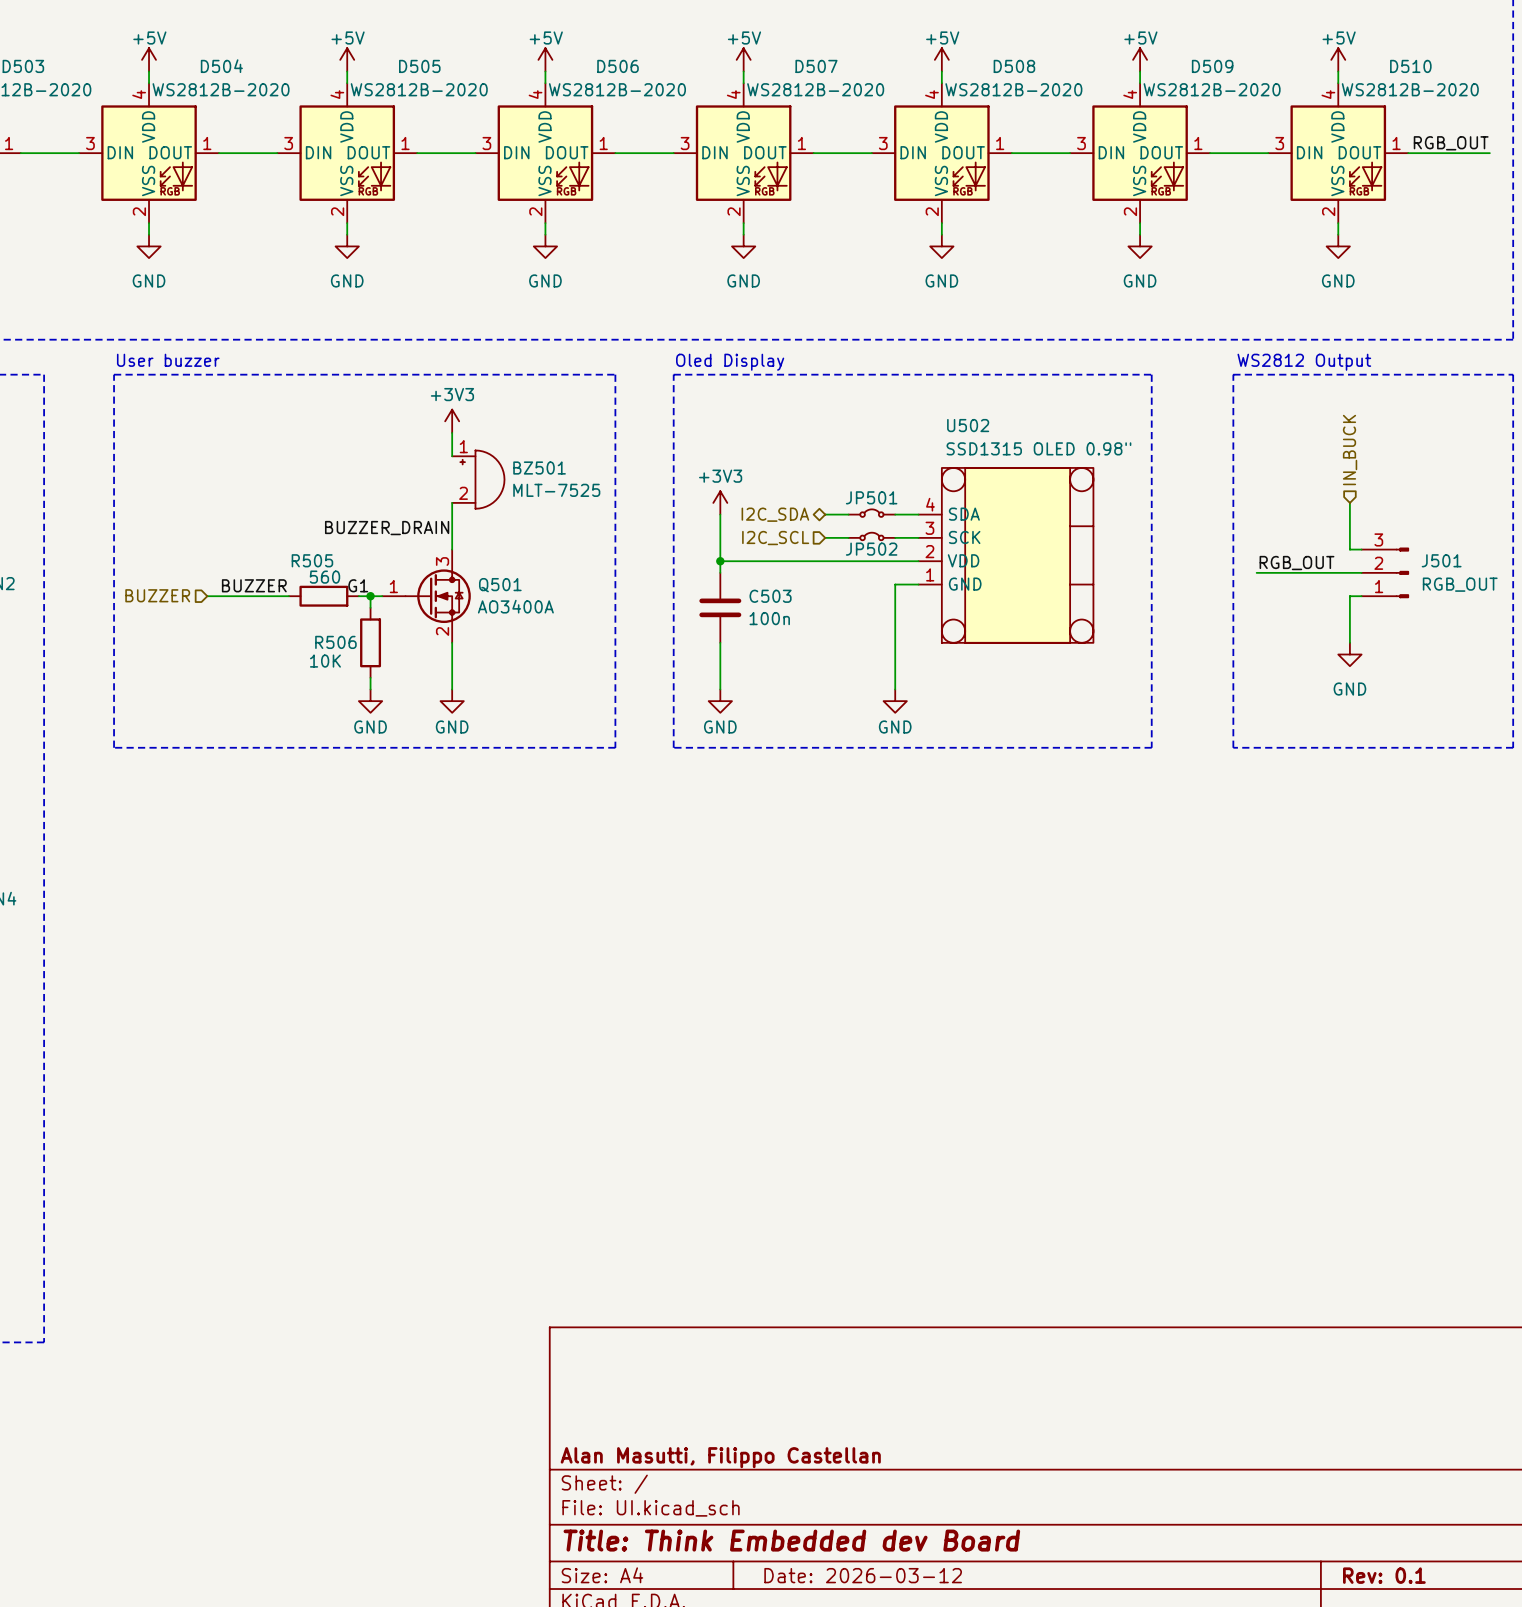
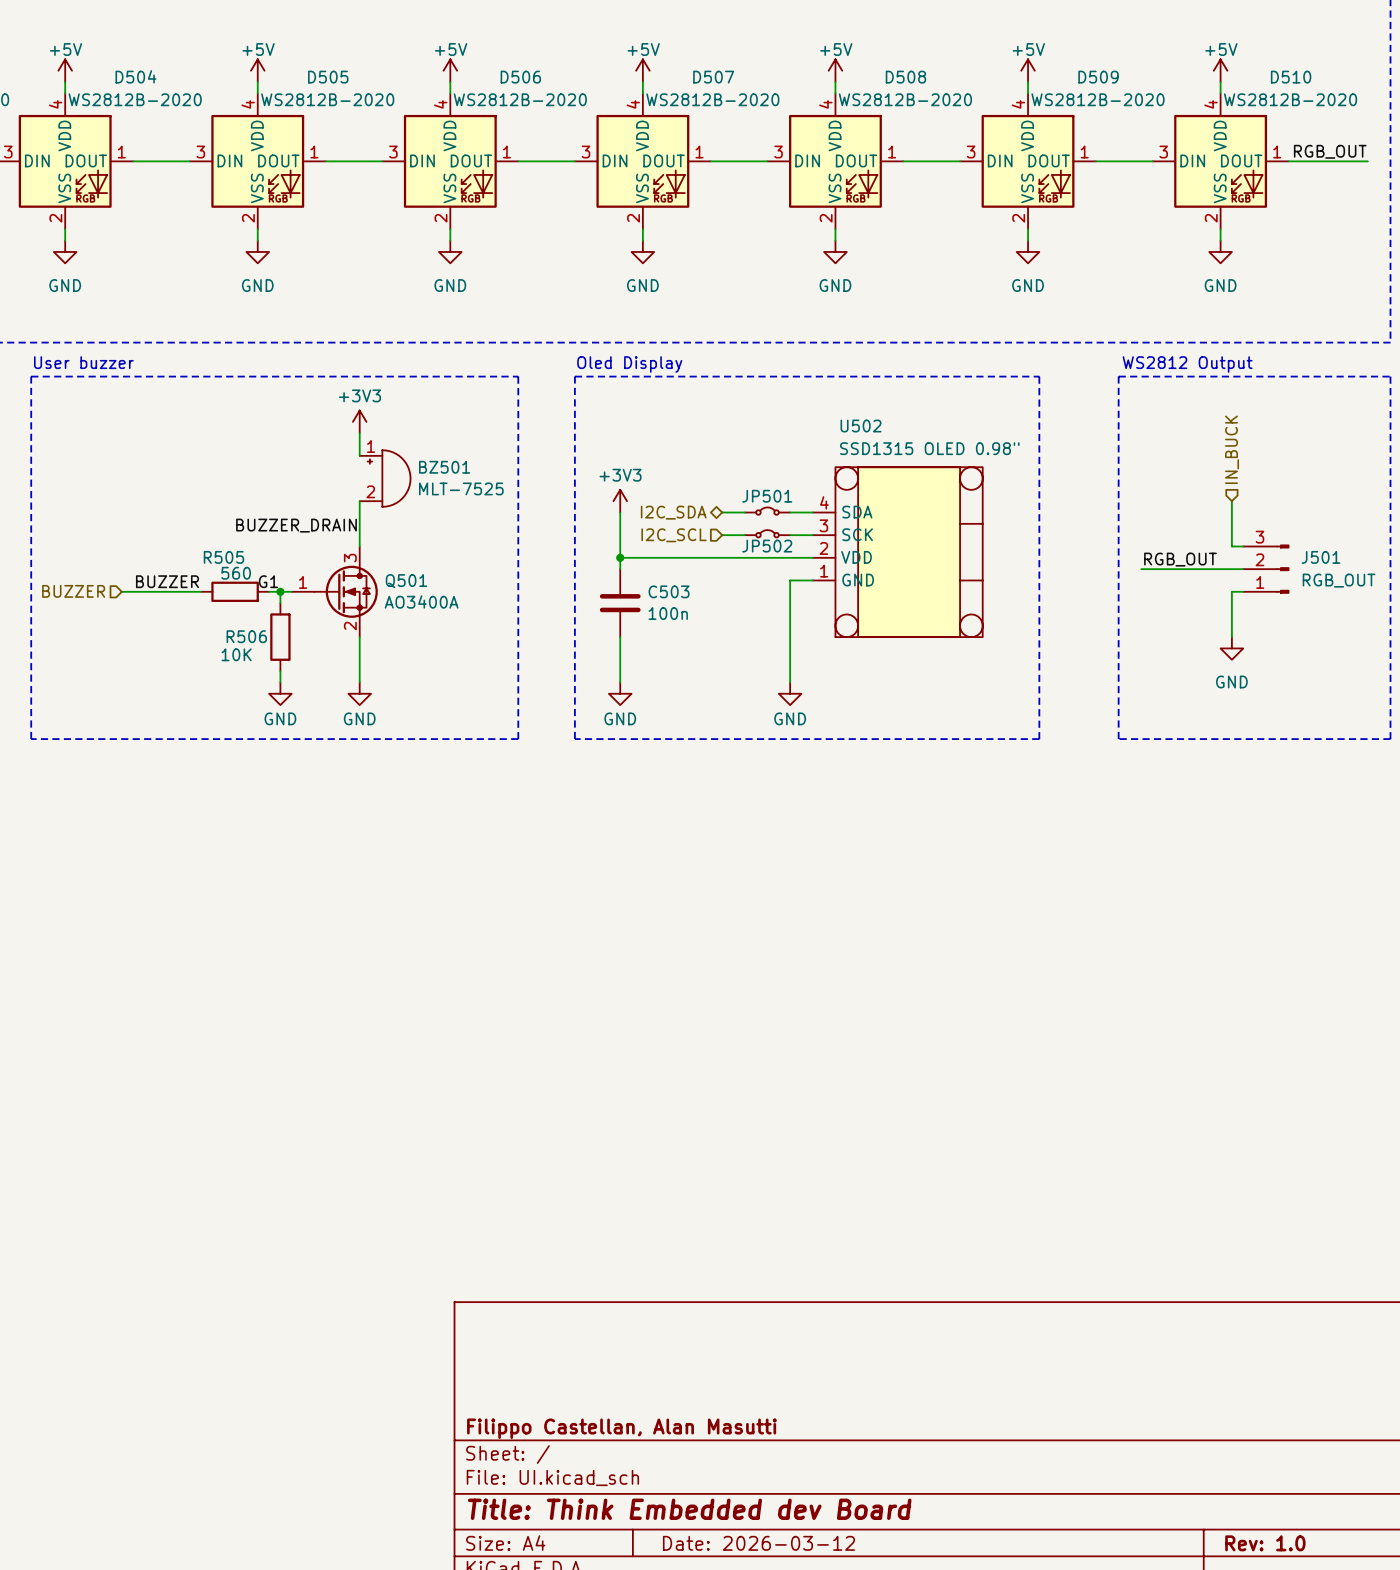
title block: Alan Masutti, Filippo Castellan (720, 1457) -> Filippo Castellan, Alan Masutti (621, 1428)
title block: Rev: 0.1 (1384, 1575) -> Rev: 1.0 (1265, 1543)

